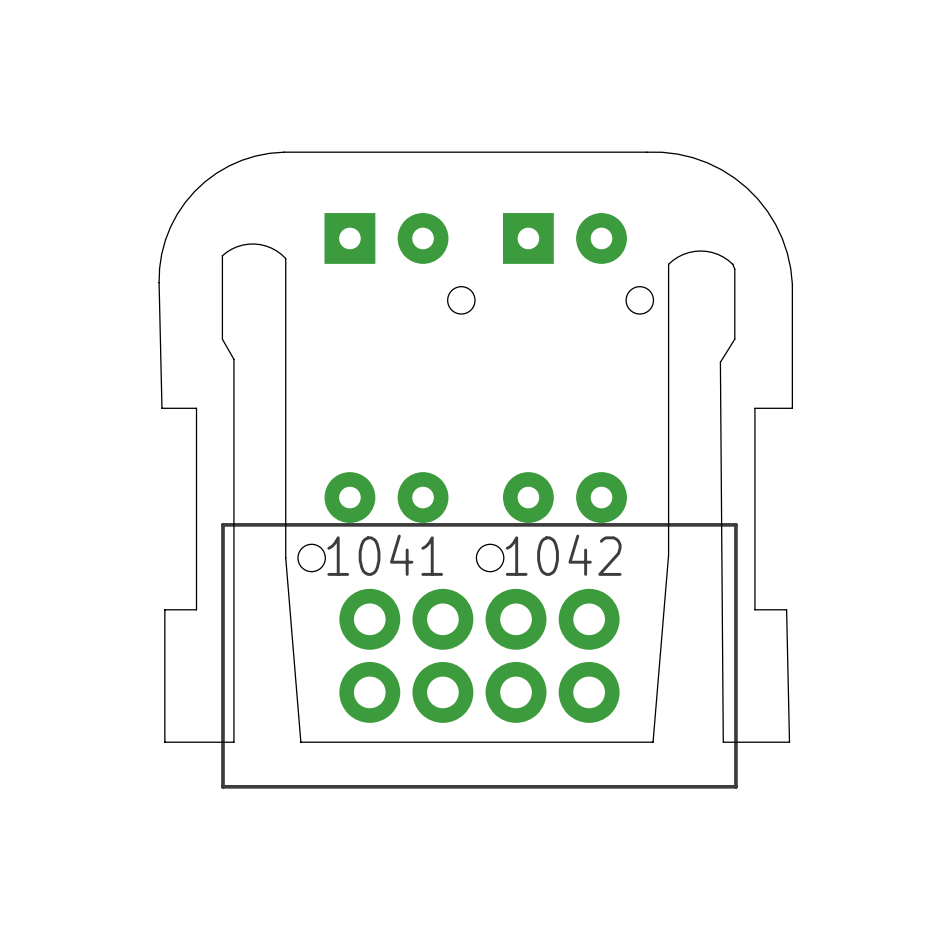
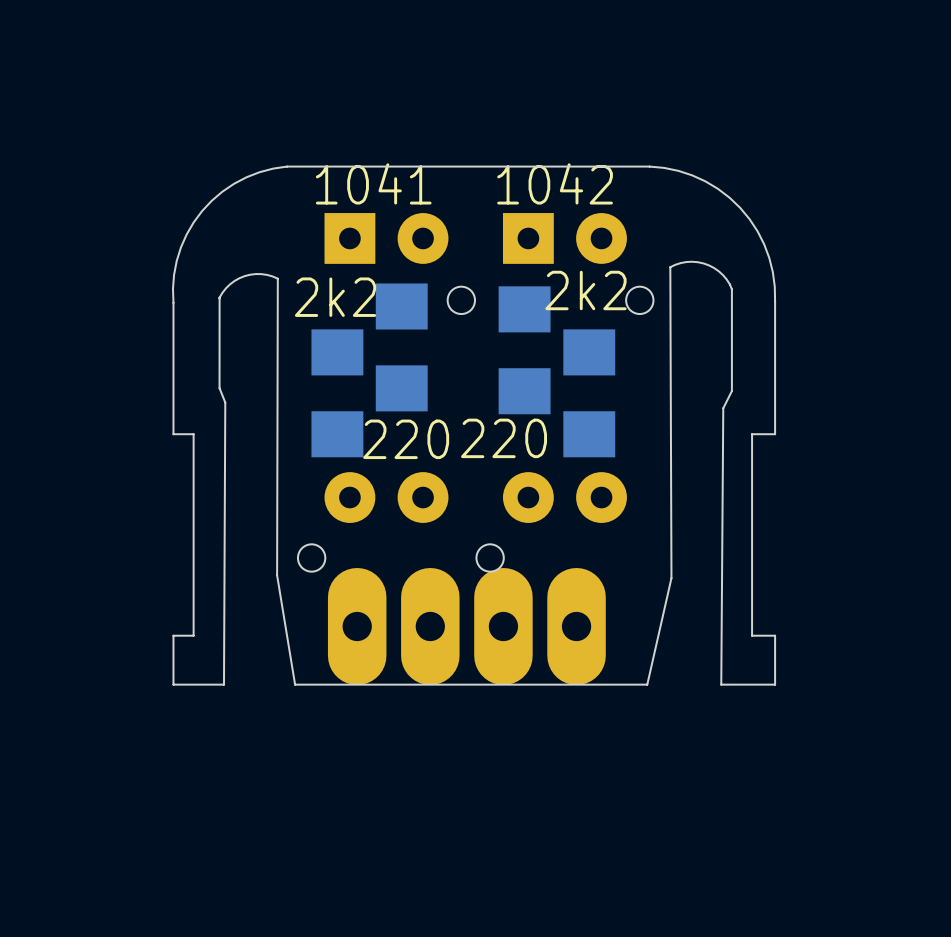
board edge: (646, 152) (269, 153) (242, 160) (216, 173) (194, 191) (185, 202) (170, 226) (161, 254) (159, 268) (161, 408) (196, 408) (196, 609) (164, 609) (164, 742) (233, 742) (233, 359) (222, 339) (222, 255) (237, 246) (254, 244) (271, 248) (285, 258) (285, 557) (300, 742) (653, 742) (668, 555) (668, 264) (683, 254) (700, 251) (712, 252) (723, 257) (732, 264) (734, 269) (734, 339) (720, 362) (723, 742) (789, 742) (786, 609) (754, 609) (754, 408) (792, 408) (792, 283) (787, 253) (782, 238) (767, 211) (757, 198) (734, 178) (721, 169) (692, 157) (677, 154) (646, 152) -> (649, 166) (678, 170) (692, 175) (705, 181) (729, 197) (749, 219) (757, 231) (769, 258) (772, 272) (775, 301) (775, 434) (752, 434) (752, 635) (775, 635) (775, 684) (721, 684) (723, 408) (731, 391) (731, 289) (726, 279) (714, 268) (692, 261) (670, 267) (671, 578) (647, 684) (295, 684) (277, 575) (277, 278) (255, 274) (234, 280) (226, 288) (219, 298) (219, 388) (225, 402) (223, 684) (173, 684) (173, 635) (193, 635) (193, 434) (173, 434) (172, 288) (176, 260) (180, 247) (193, 222) (202, 211) (222, 191) (246, 177) (273, 168) (287, 166) (649, 166)
part: none -> 220 (401, 347)
part: none -> 220 (524, 350)
part: none -> 2k2 (337, 393)
part: none -> 2k2 (589, 393)
text position: 1041 (385, 555) -> 1041 (373, 183)
text position: 1042 (563, 555) -> 1042 (555, 183)
part: none -> (466, 626)
part: (479, 655) -> none

